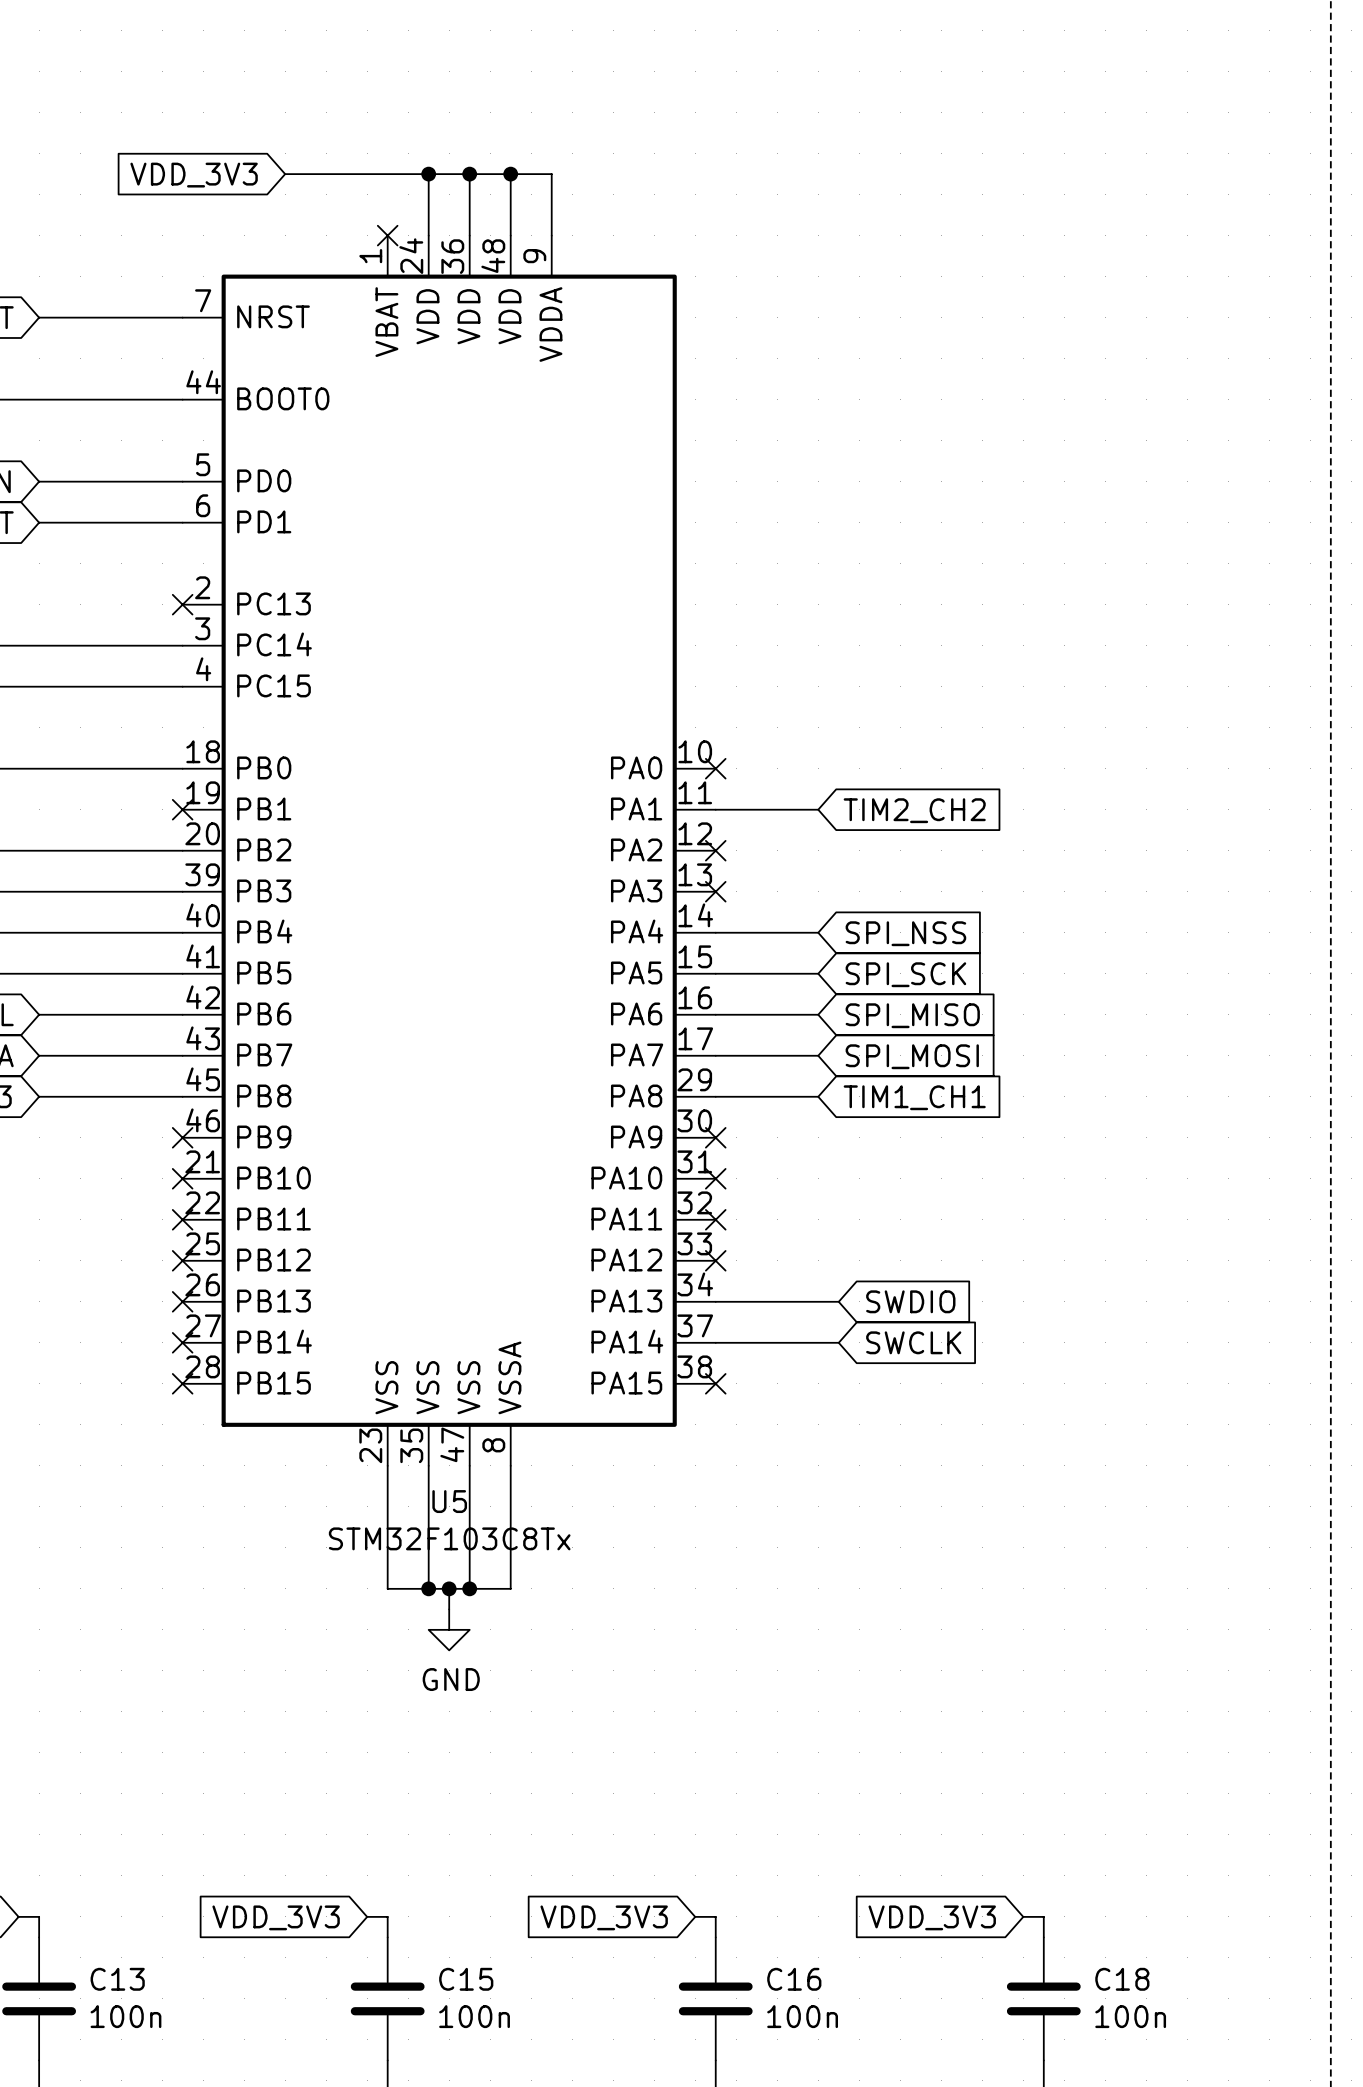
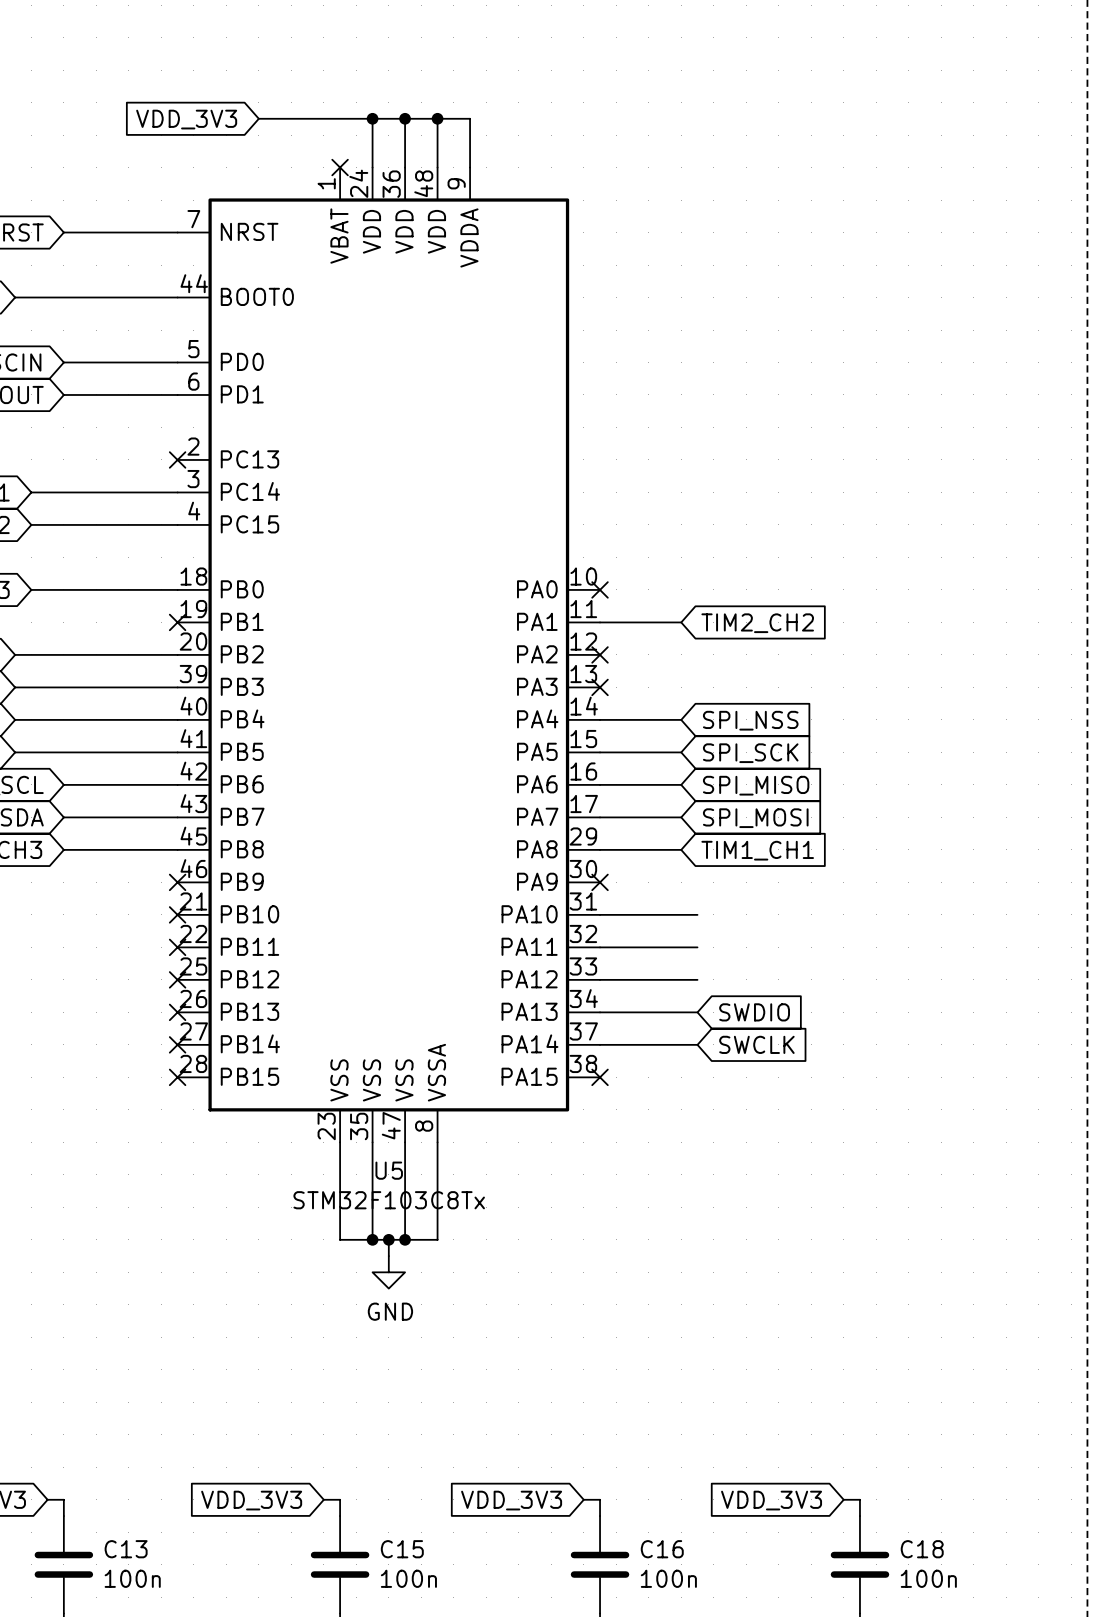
wire: none -> (600, 914) (697, 914)
no-connect mark: (715, 1178) -> none
wire: none -> (600, 947) (697, 947)
no-connect mark: (715, 1219) -> none
wire: none -> (600, 979) (697, 979)
no-connect mark: (715, 1260) -> none

